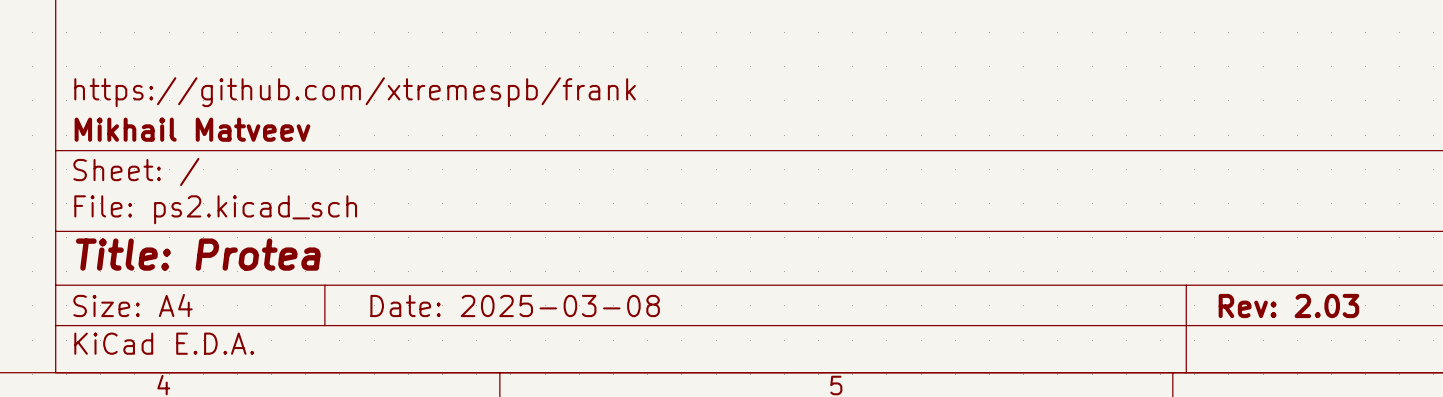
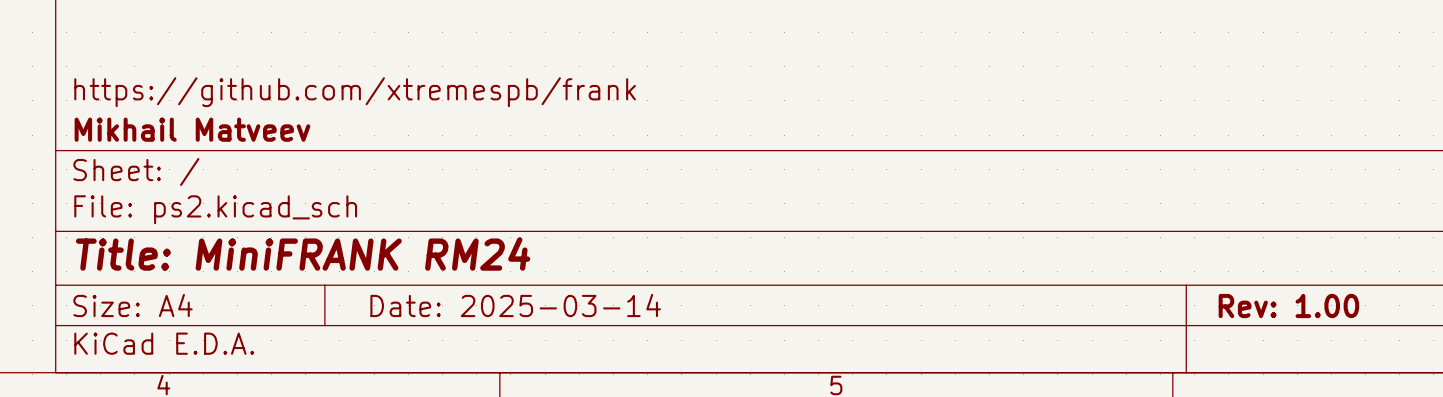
title block: Title: Protea (198, 254) -> Title: MiniFRANK RM24 (303, 253)
title block: Date: 2025-03-08 (515, 305) -> Date: 2025-03-14 (515, 305)
title block: Rev: 2.03 (1288, 305) -> Rev: 1.00 (1288, 305)

